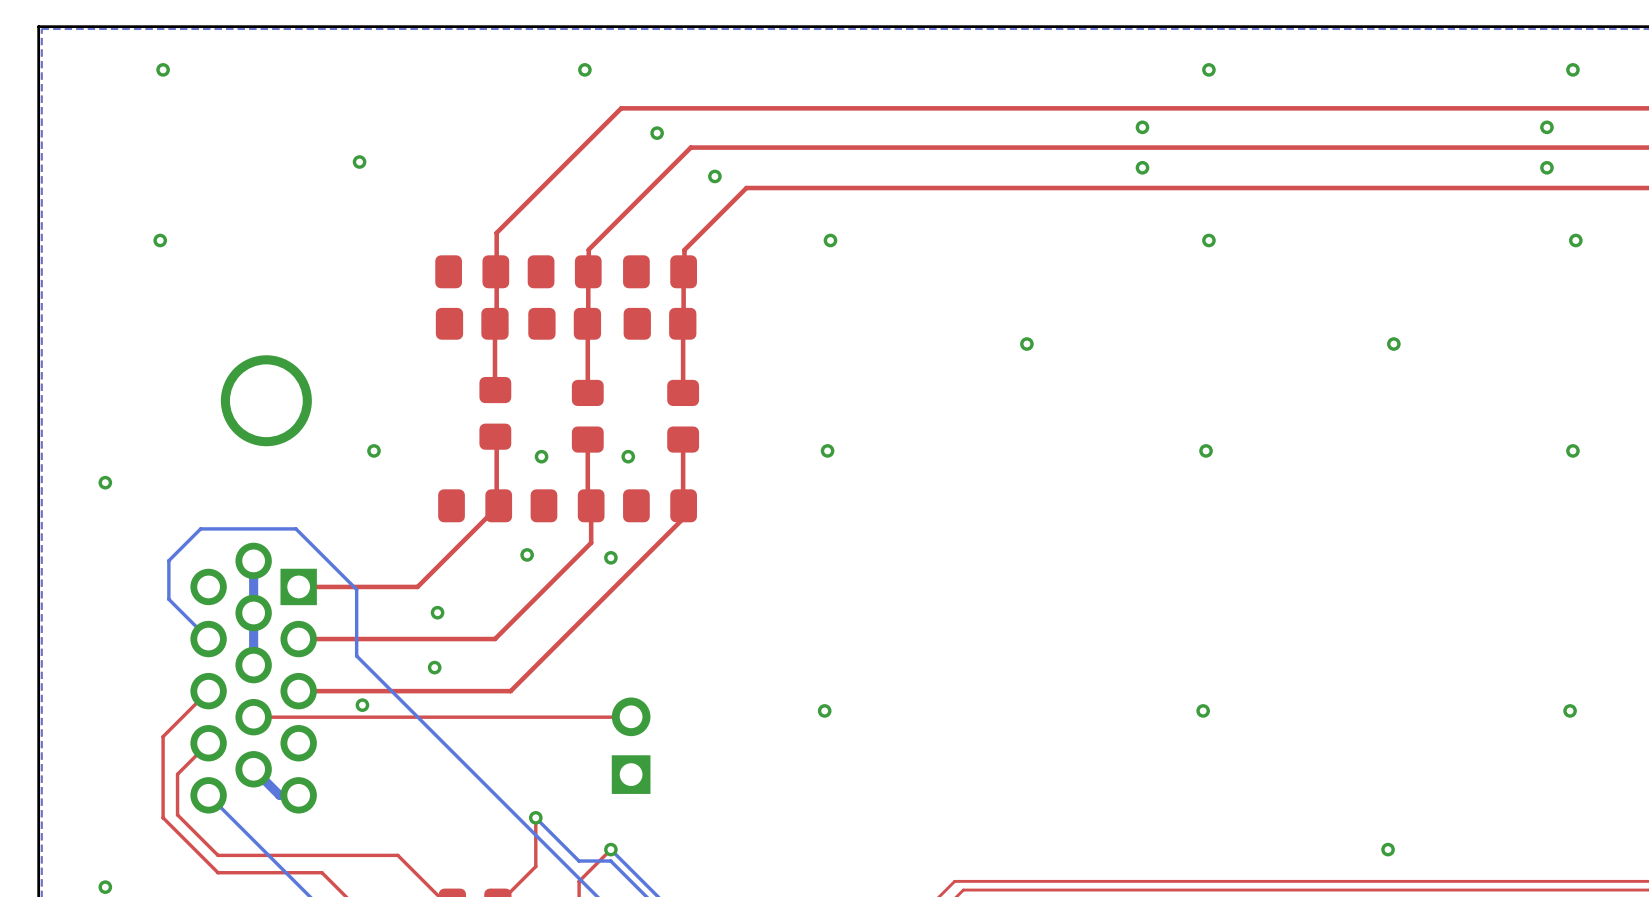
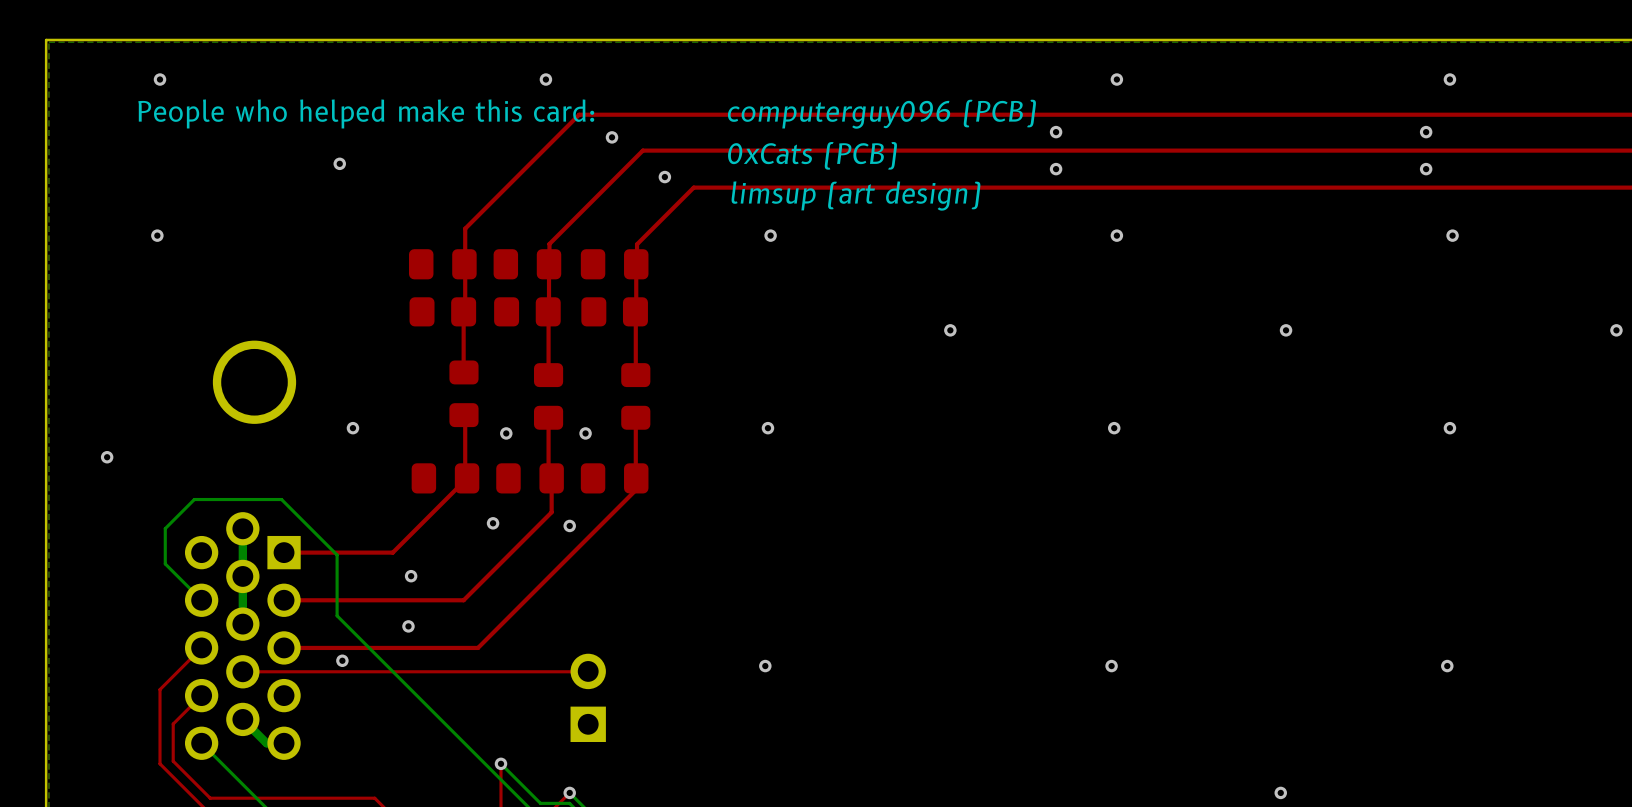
text: none -> computerguy096 (PCB) (881, 114)
text: none -> People who helped make this card: (366, 113)
text: none -> 0xCats (PCB) (812, 155)
text: none -> limsup (art design) (855, 196)

